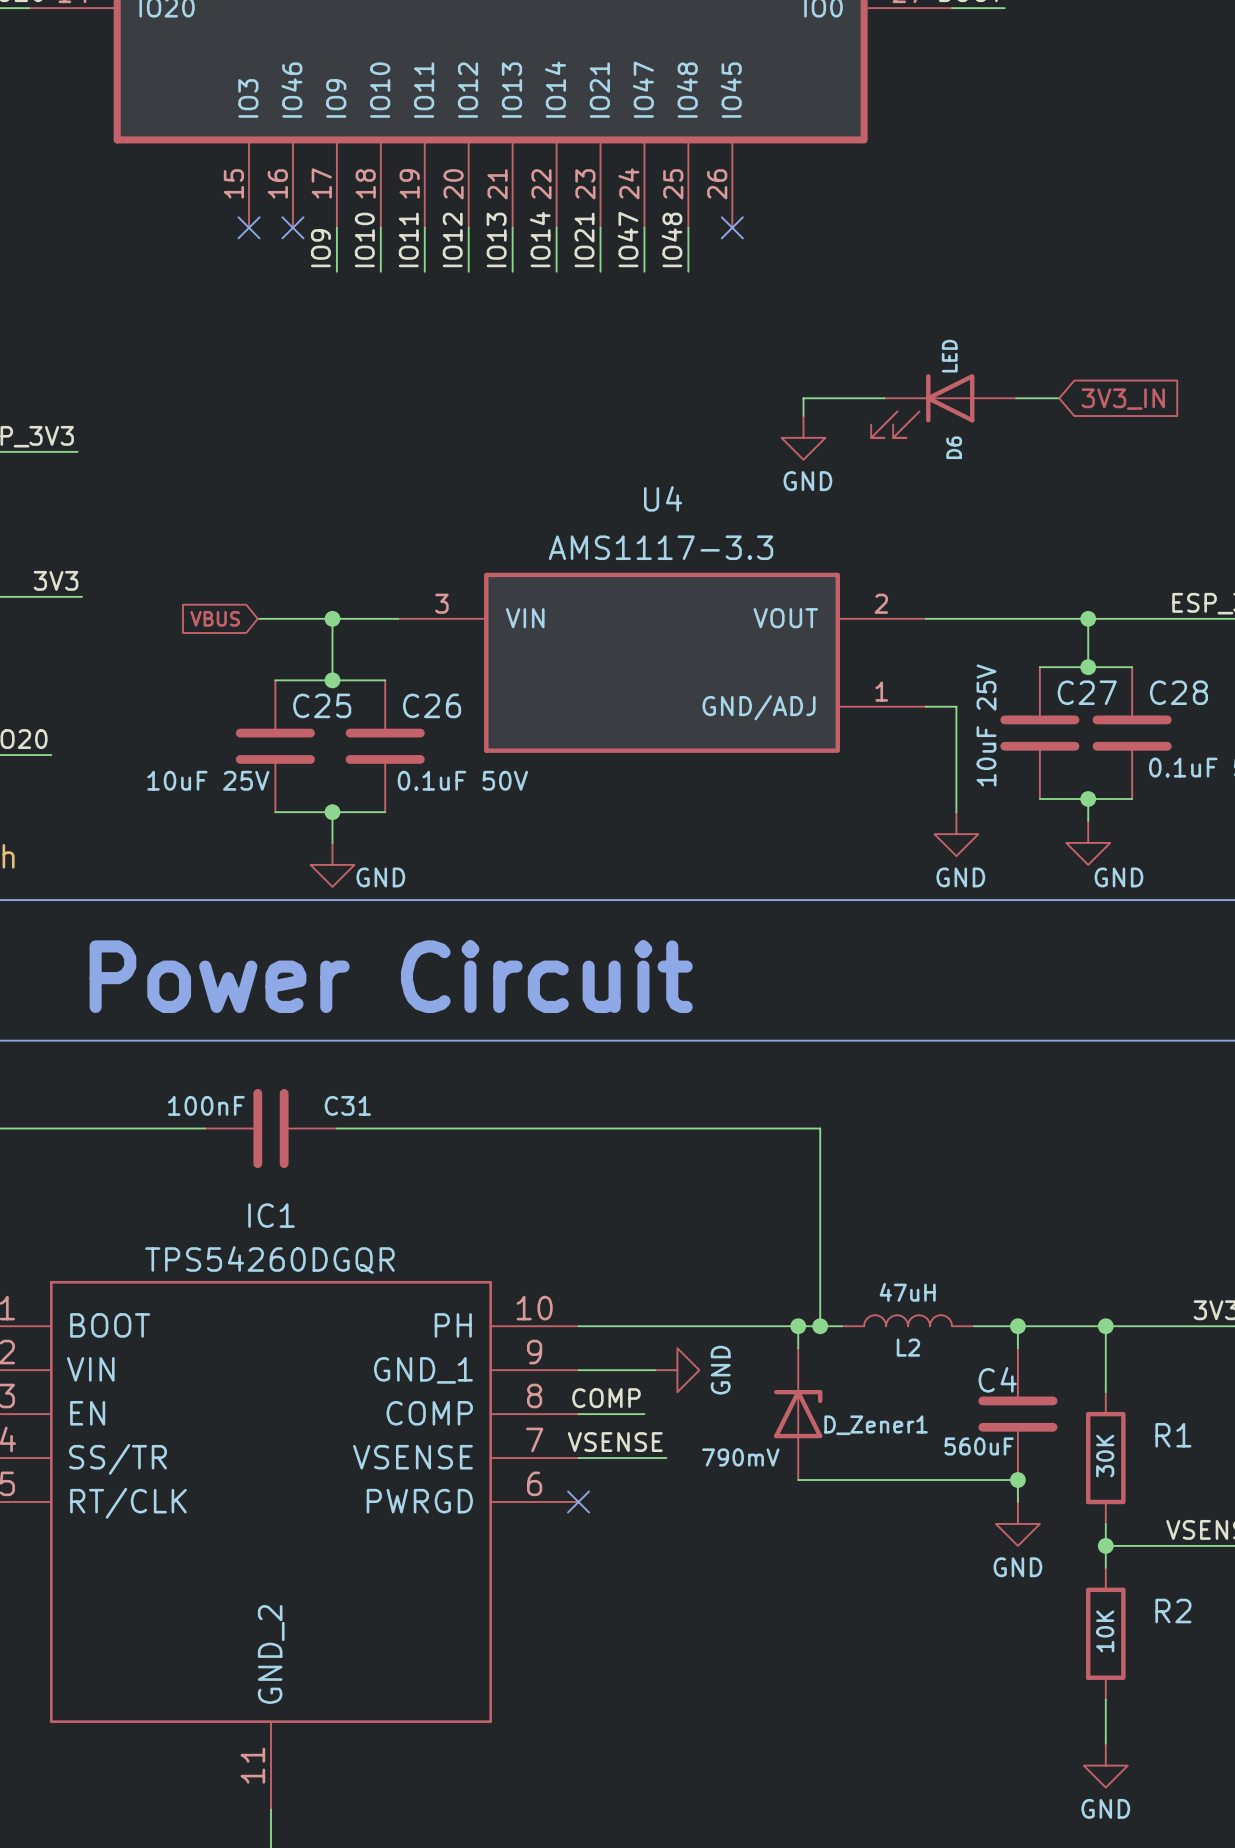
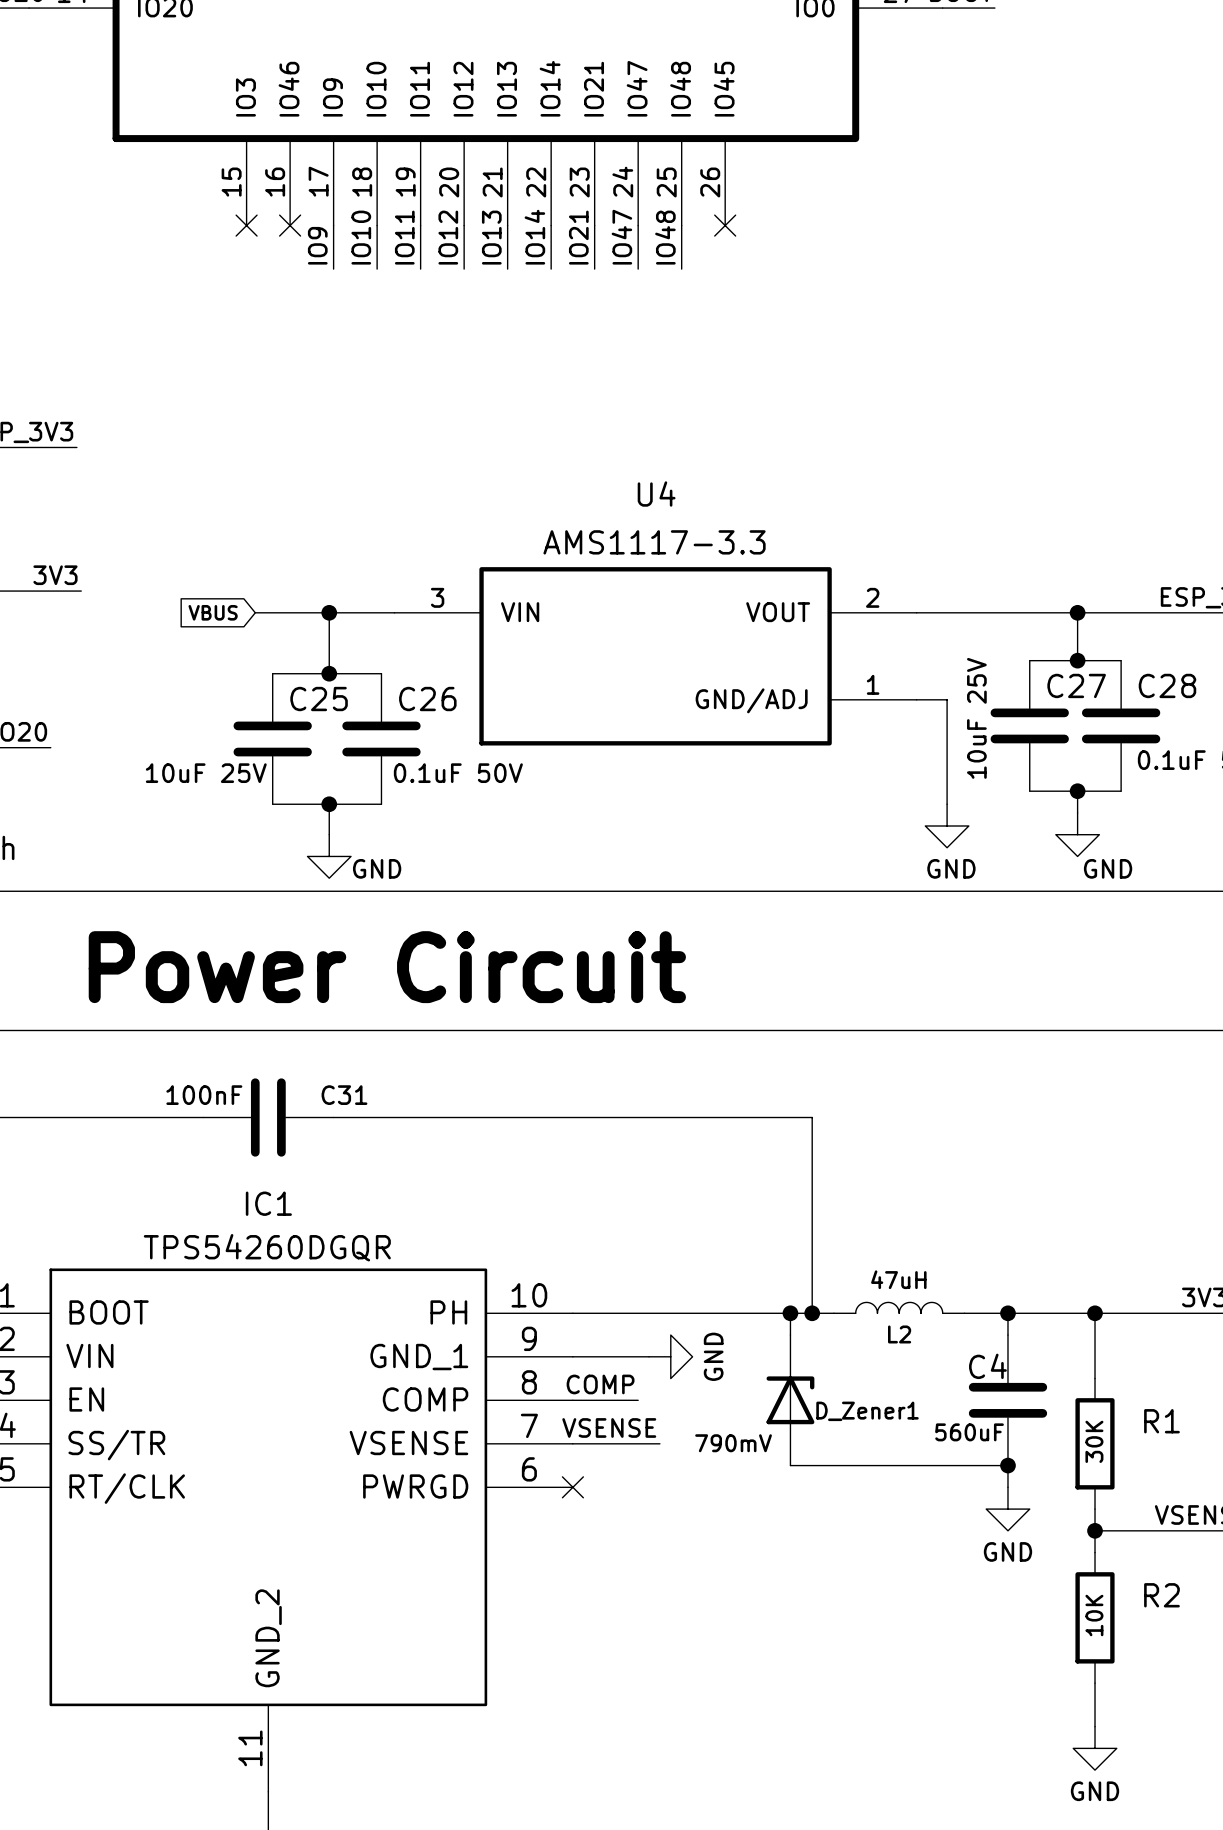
wire: (884, 398) (803, 398) (803, 415) -> none
wire: (1016, 398) (1059, 398) -> none
global label: 3V3_IN (1123, 399) -> none
D6: LED (943, 405) -> none
power symbol: GND (803, 437) -> none

